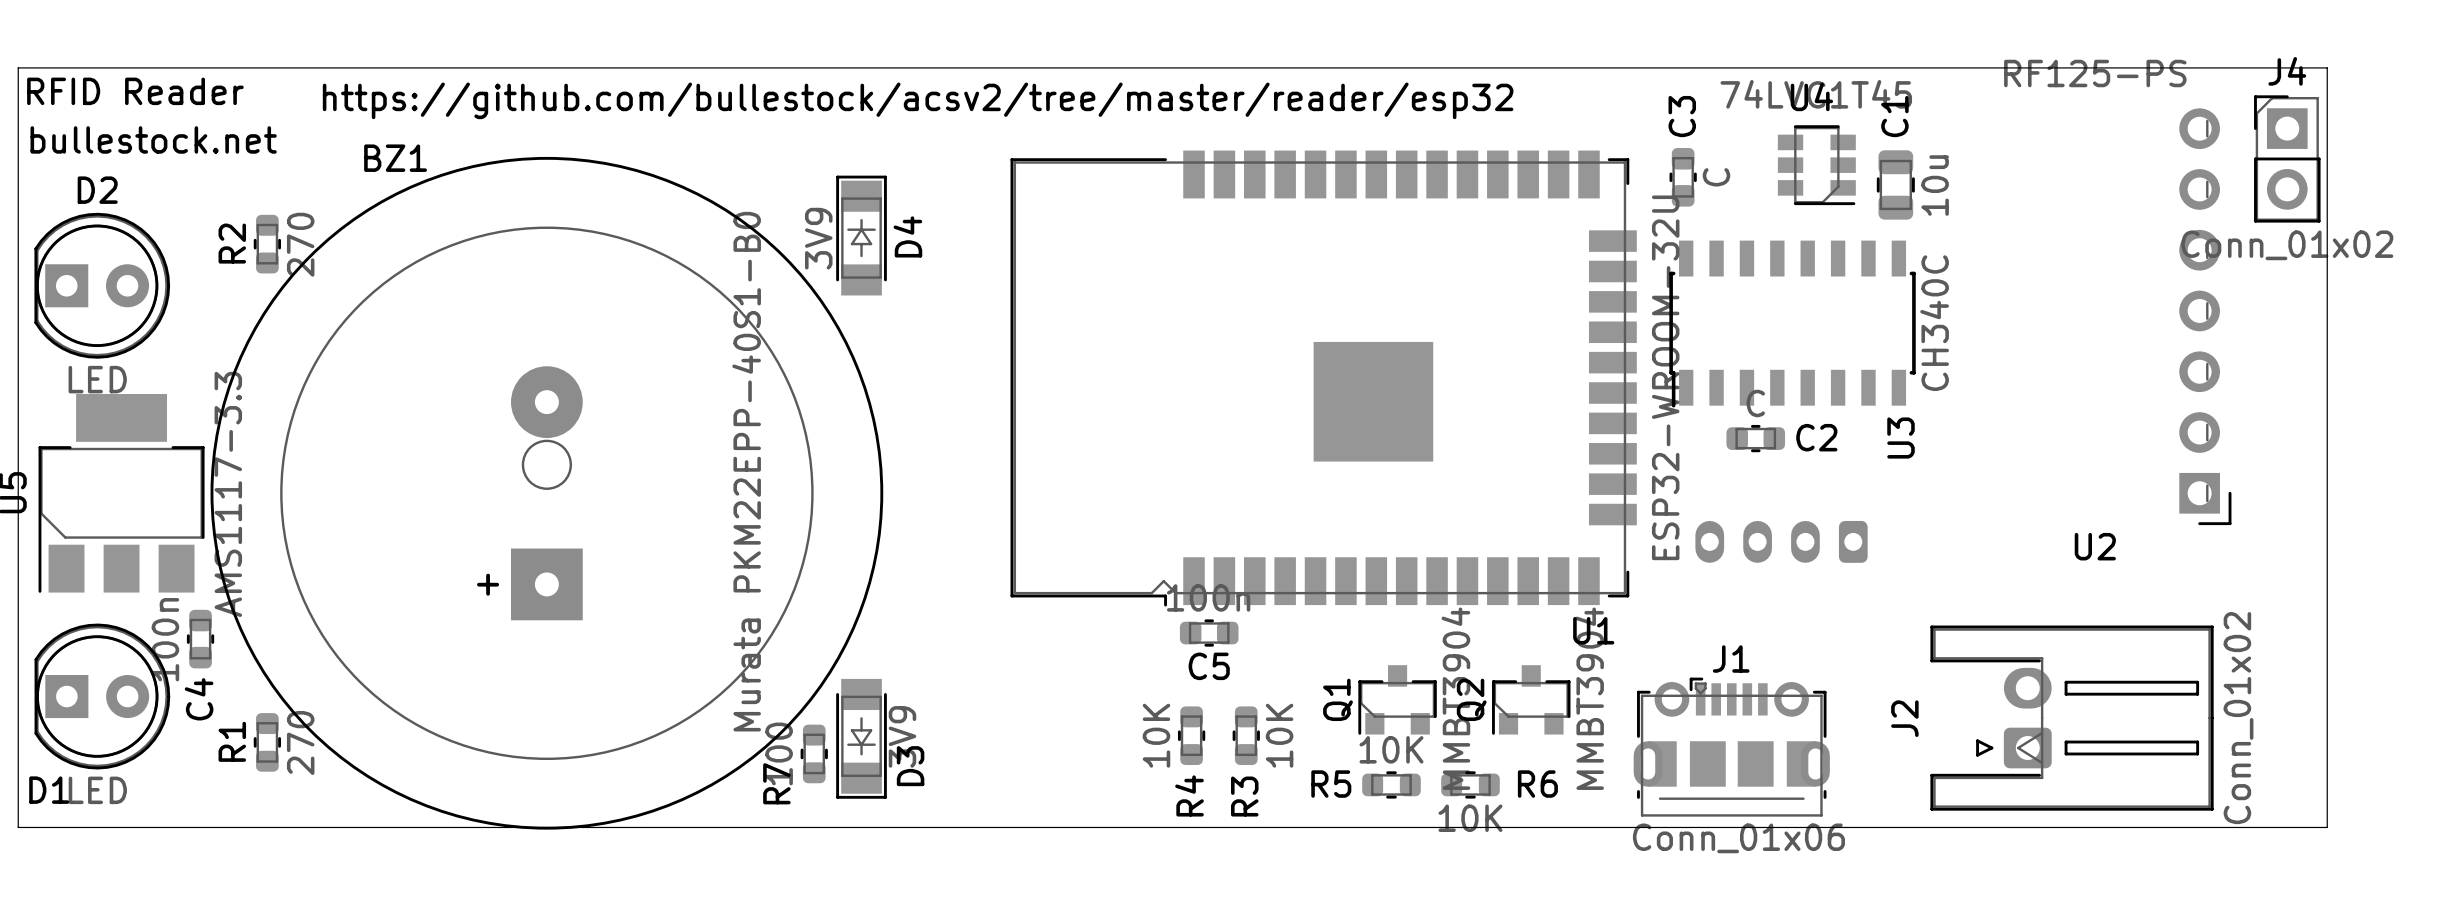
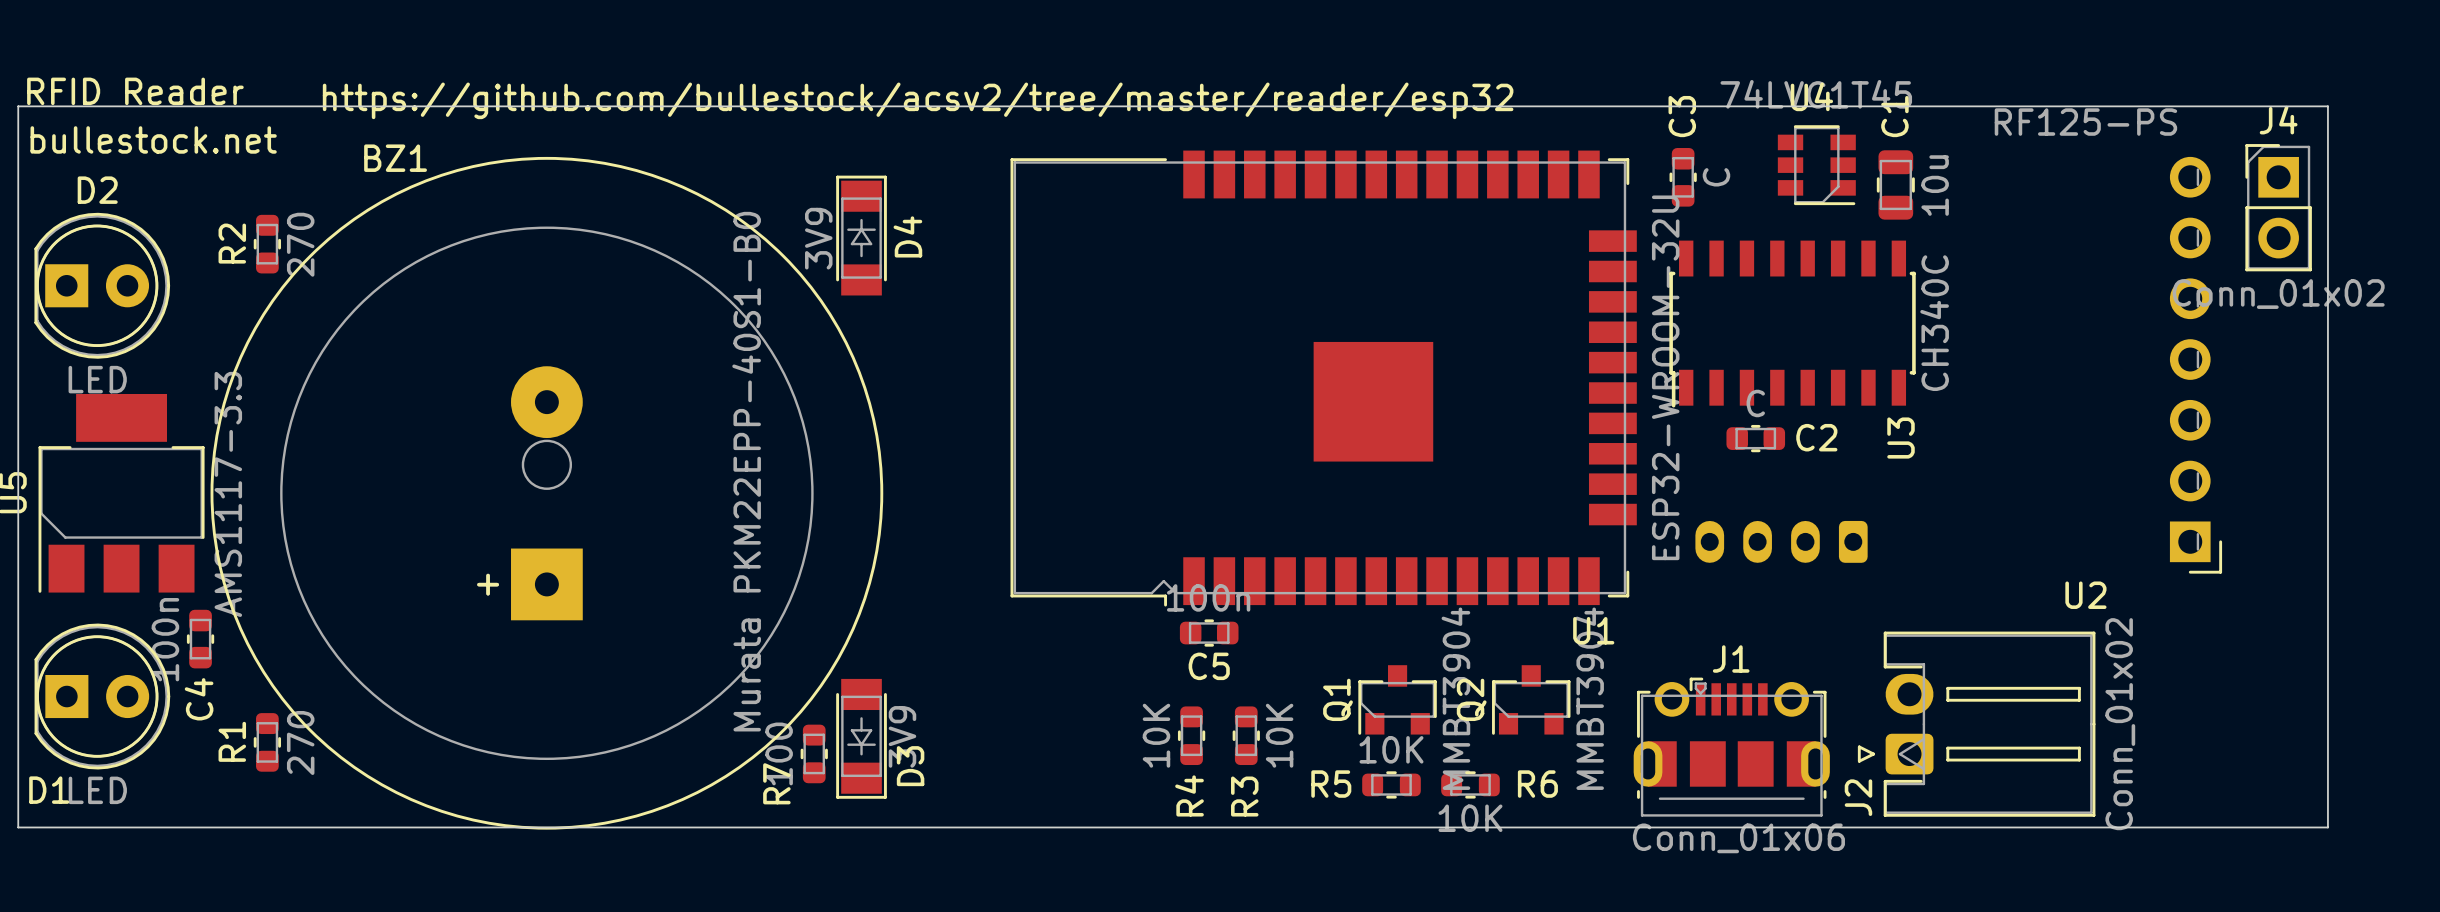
board edge: (18, 106) (18, 67) (2327, 67) (2327, 827) -> (18, 106) (2327, 106) (2327, 827)
J4 position: (2287, 158) -> (2278, 207)
U2 position: (2205, 316) -> (2196, 365)
J2 footprint: [1930, 625, 2214, 811] -> [1857, 631, 2096, 817]
J2 name position: J2 (1904, 718) -> J2 (1858, 797)

